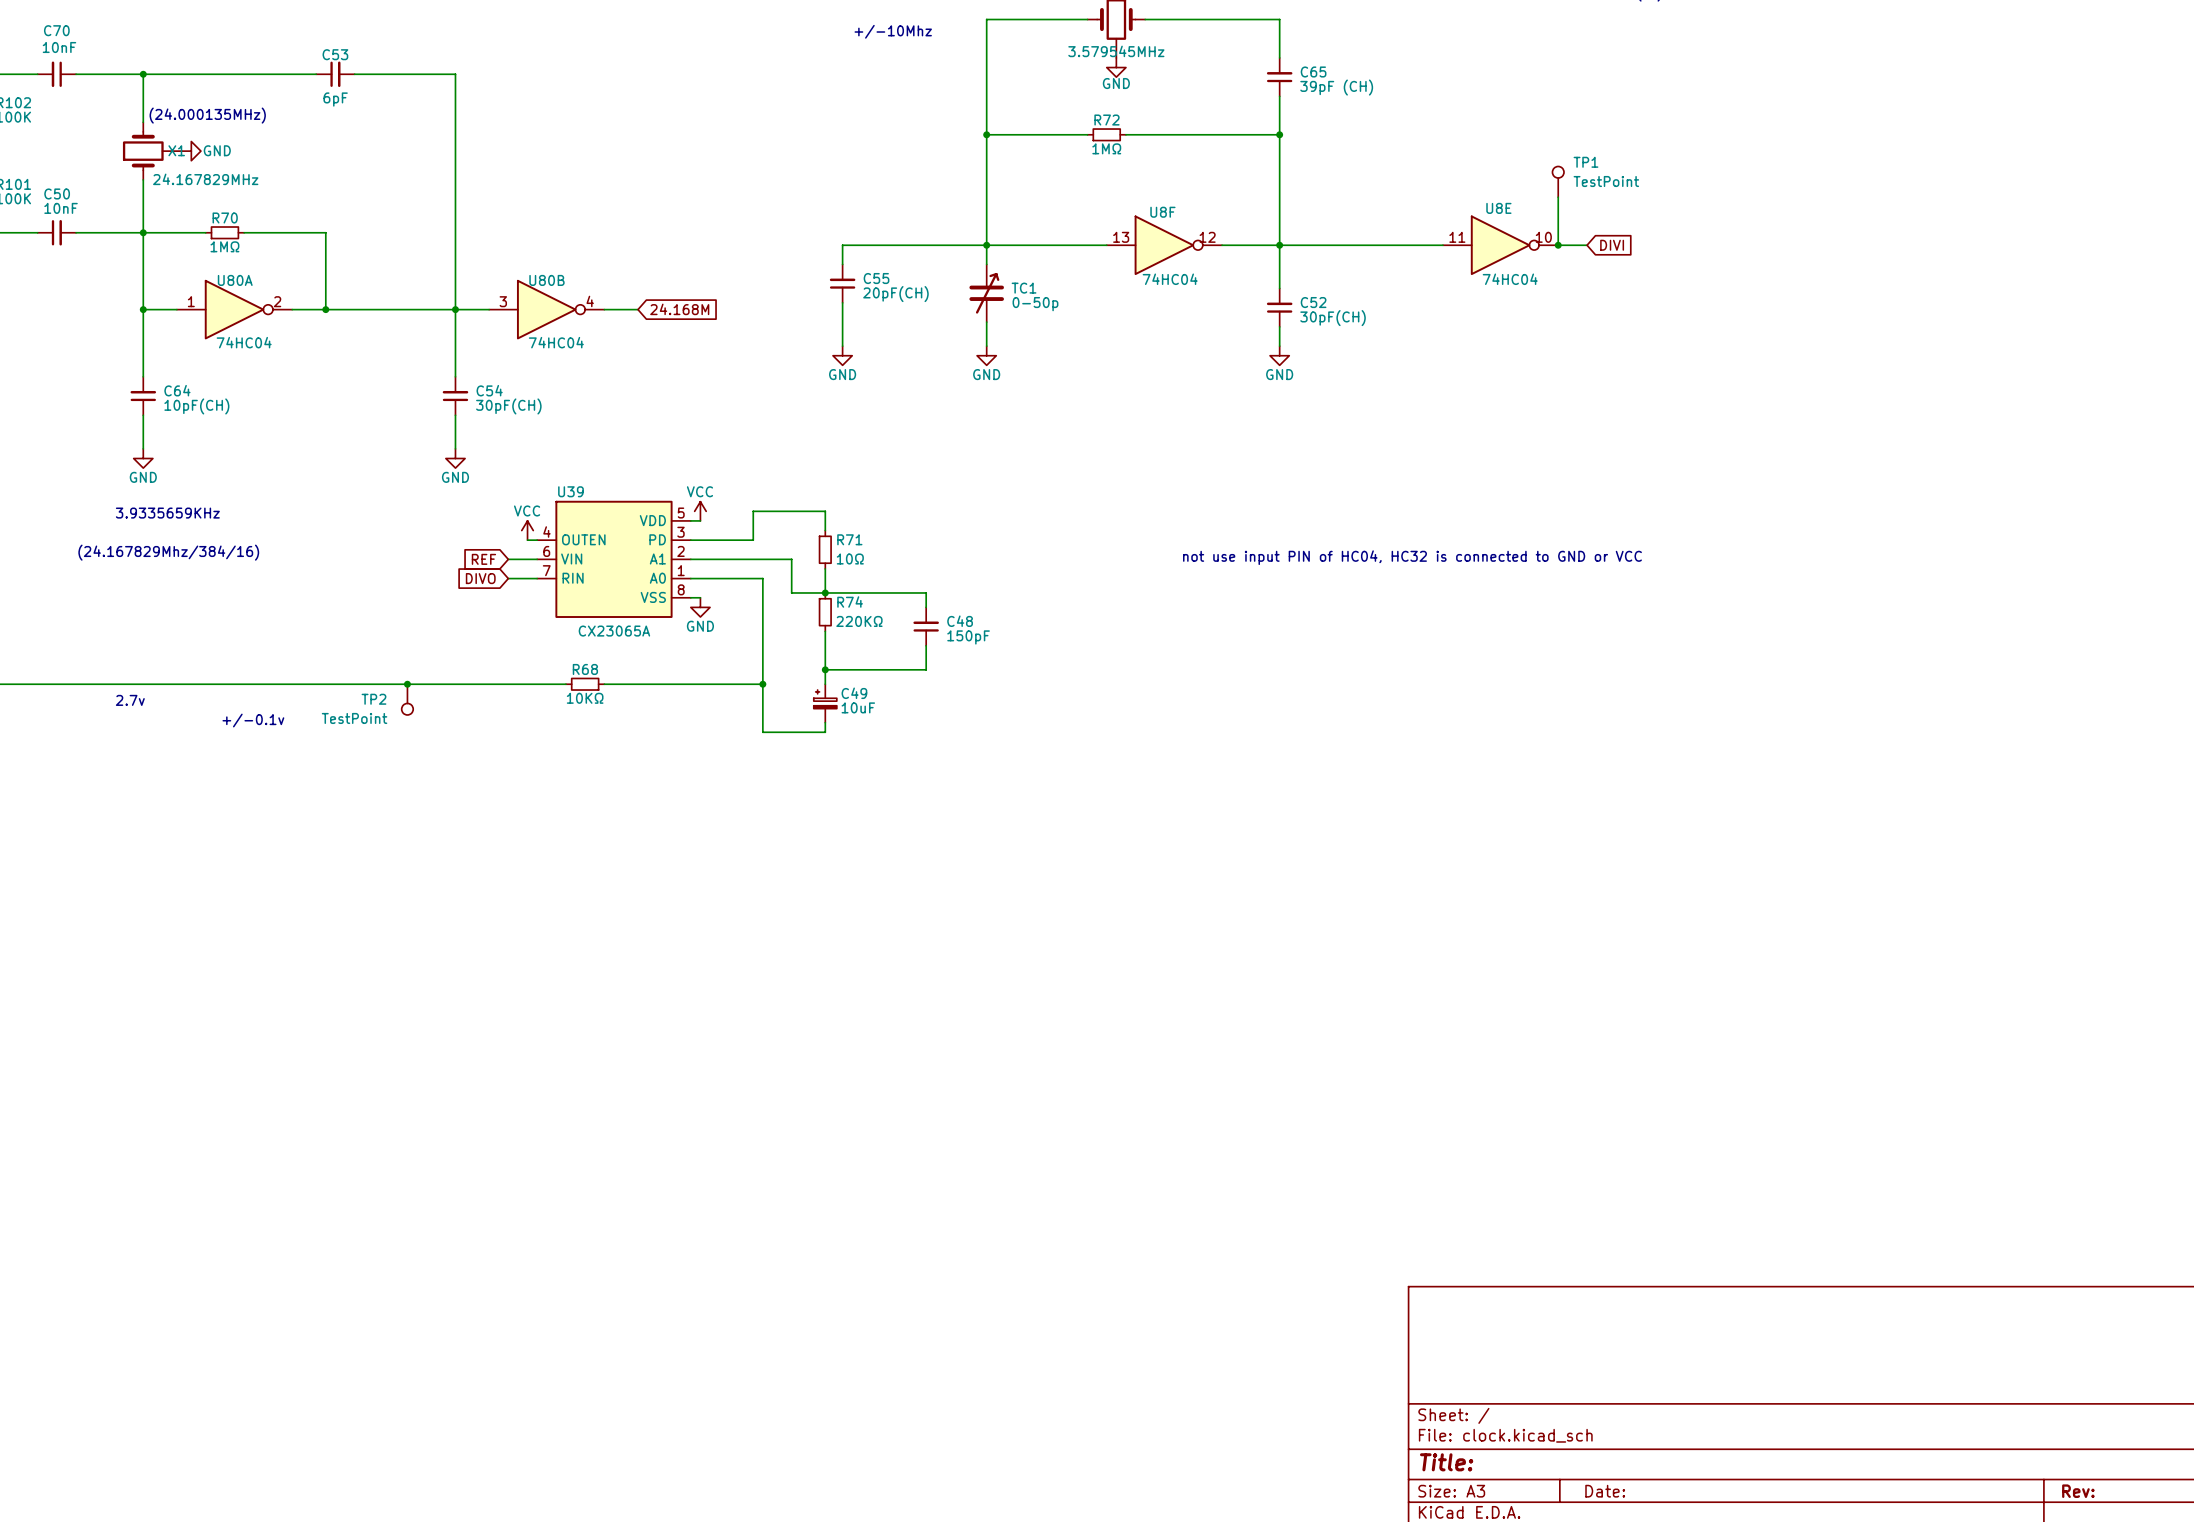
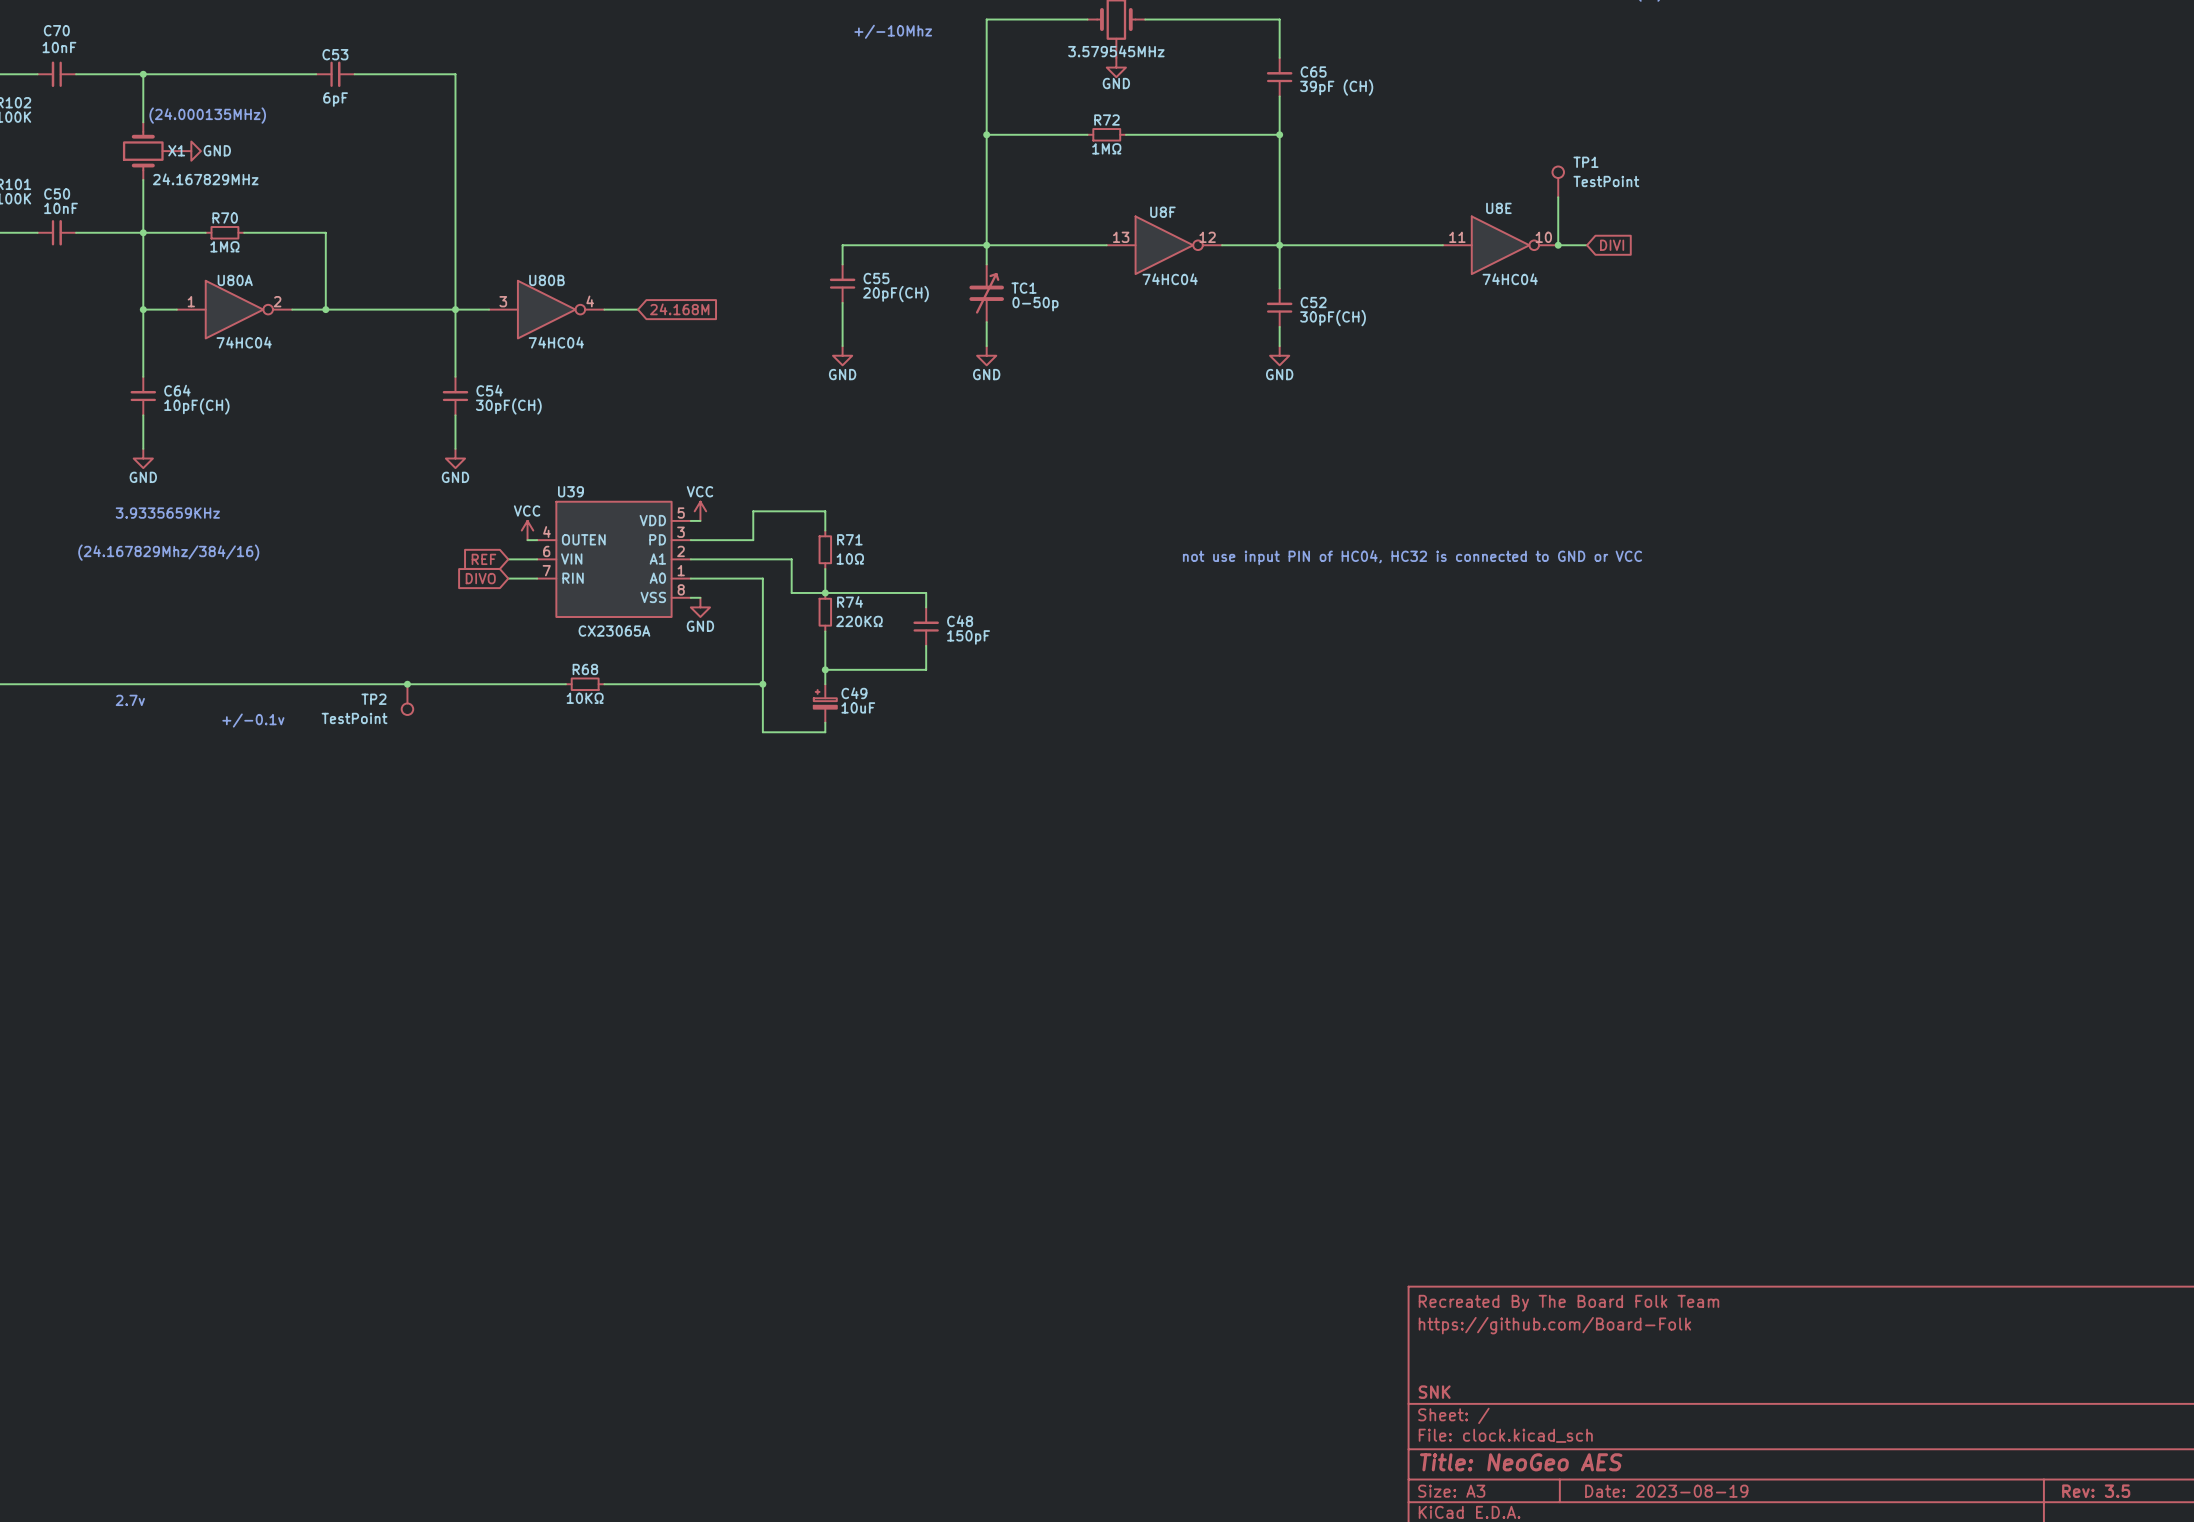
title block: none -> Recreated By The Board Folk Team (1568, 1303)
title block: none -> https://github.com/Board-Folk (1554, 1325)
title block: none -> SNK (1434, 1392)
title block: Title: (1446, 1462) -> Title: NeoGeo AES (1521, 1462)
title block: Date: (1605, 1491) -> Date: 2023-08-19 (1666, 1491)
title block: Rev: (2078, 1491) -> Rev: 3.5 (2096, 1491)

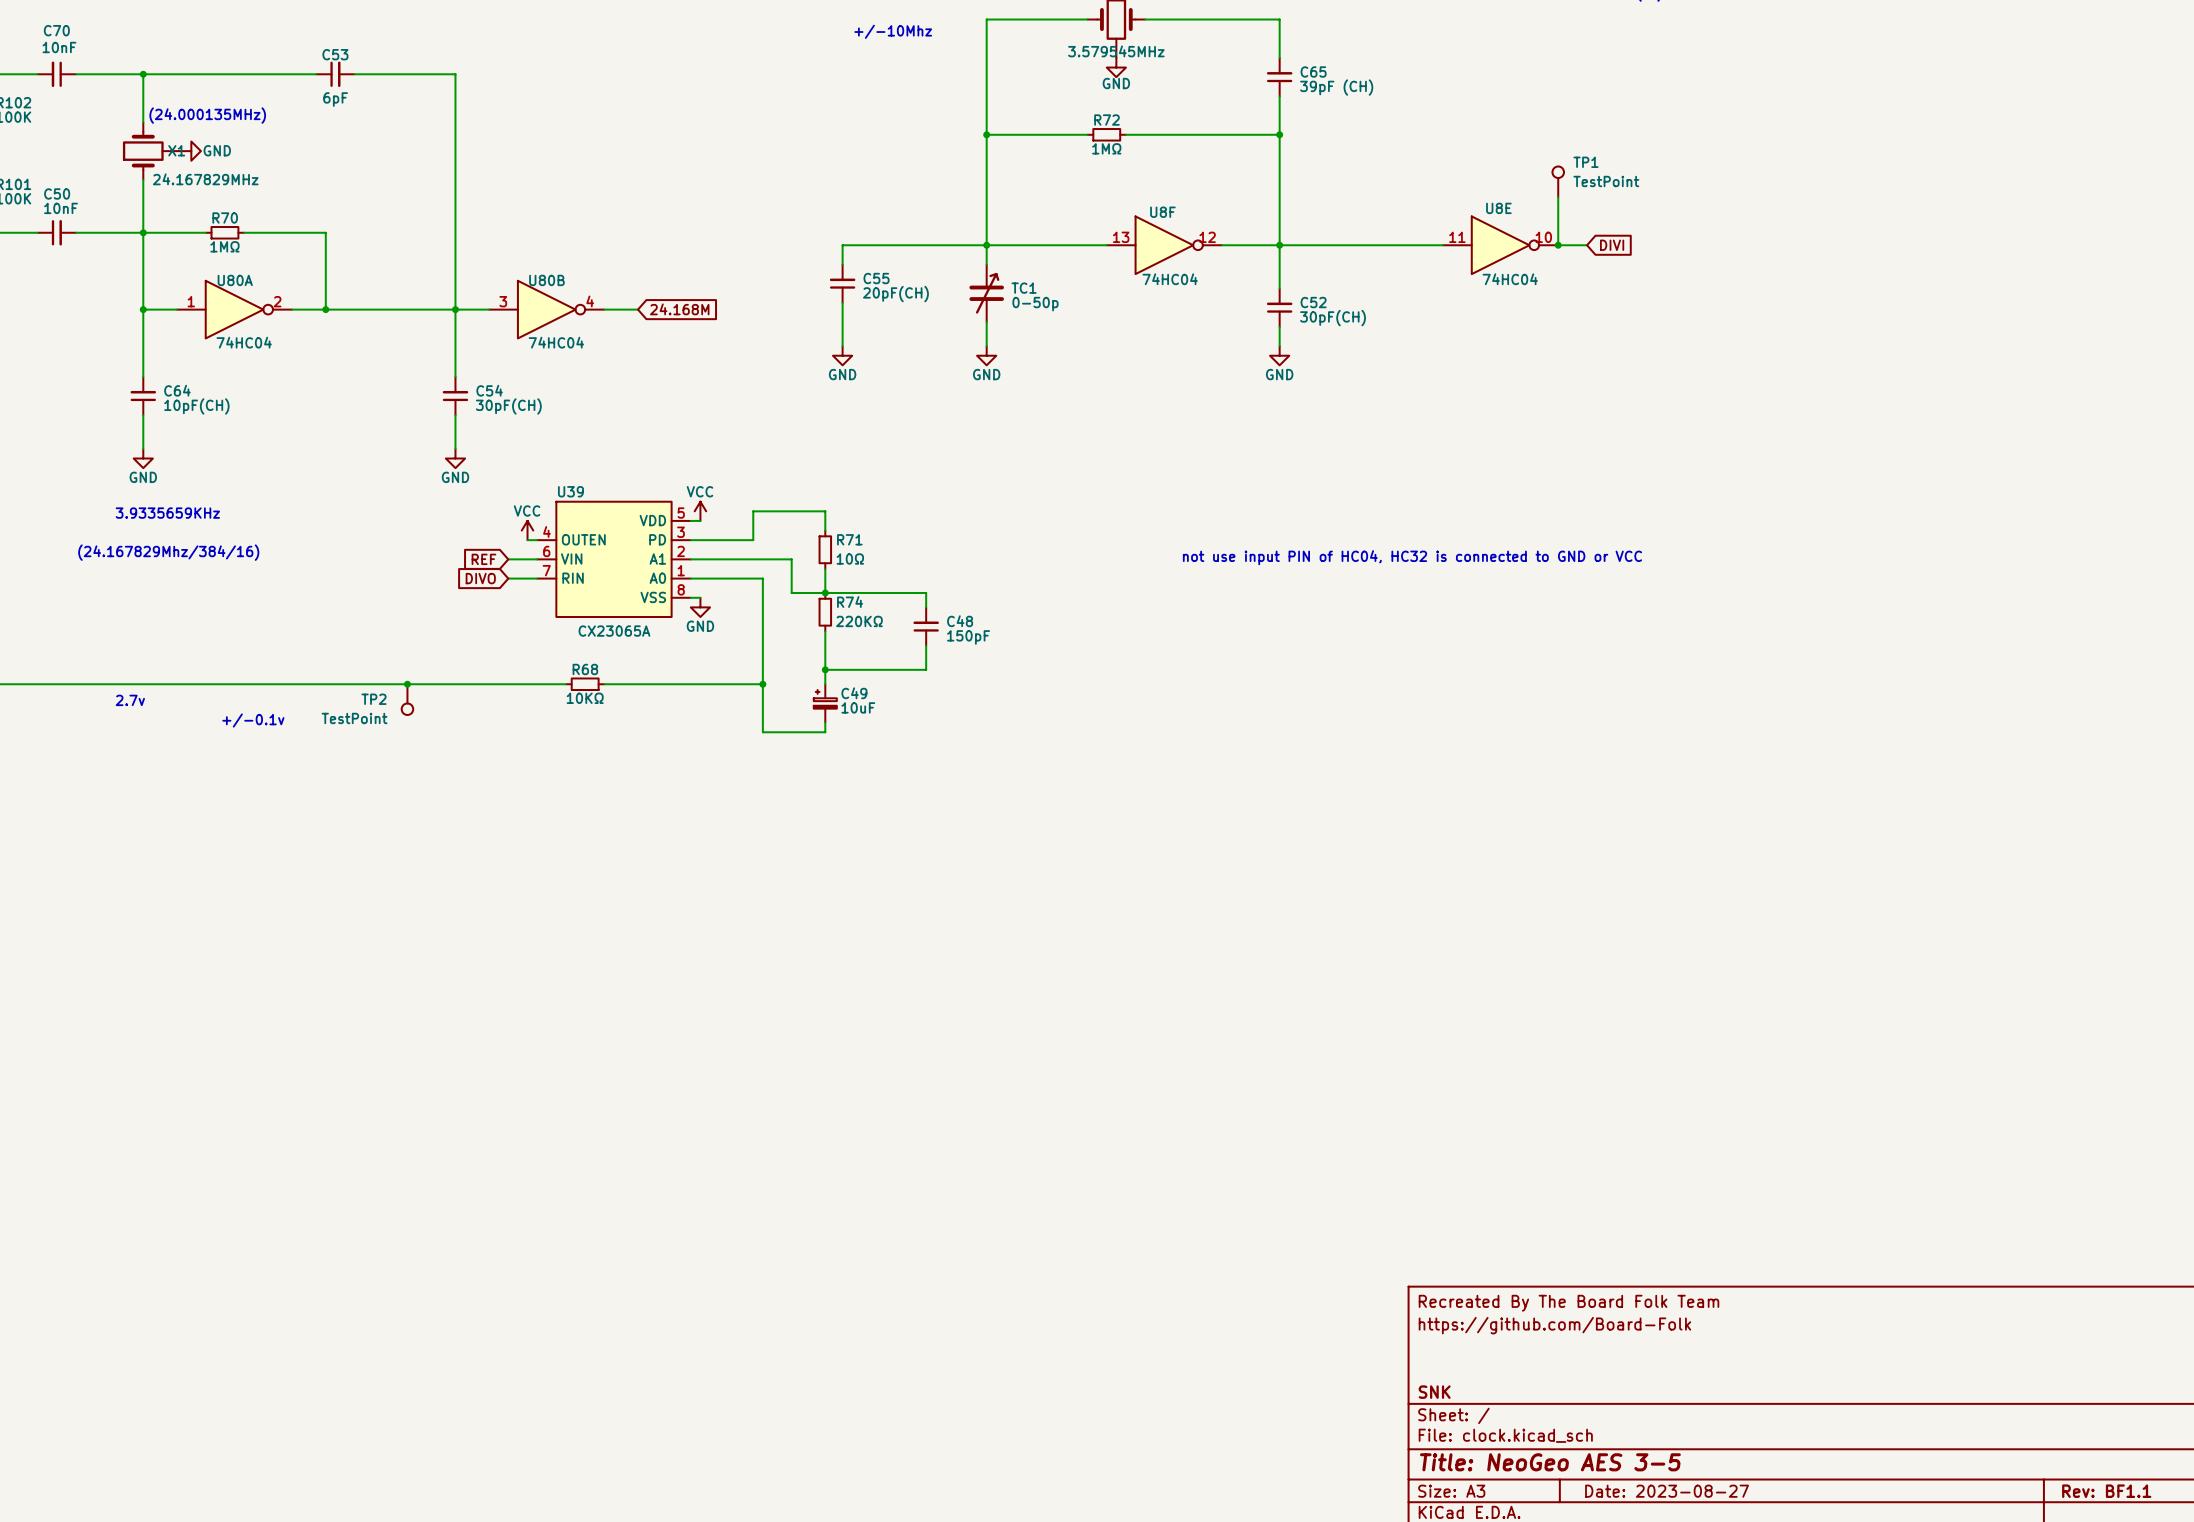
title block: Title: NeoGeo AES (1521, 1462) -> Title: NeoGeo AES 3-5 (1550, 1462)
title block: Date: 2023-08-19 (1666, 1491) -> Date: 2023-08-27 (1667, 1491)
title block: Rev: 3.5 (2096, 1491) -> Rev: BF1.1 (2106, 1491)

